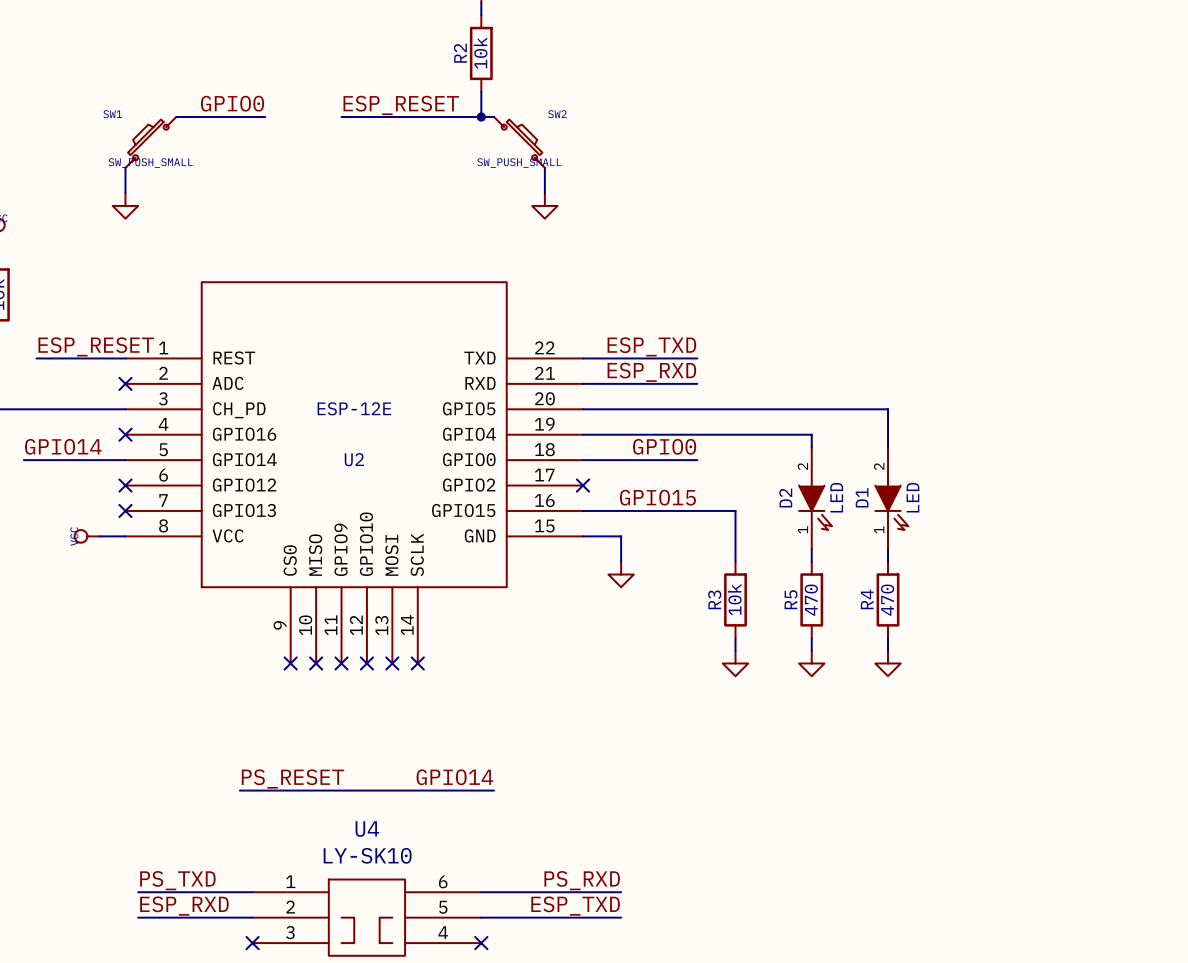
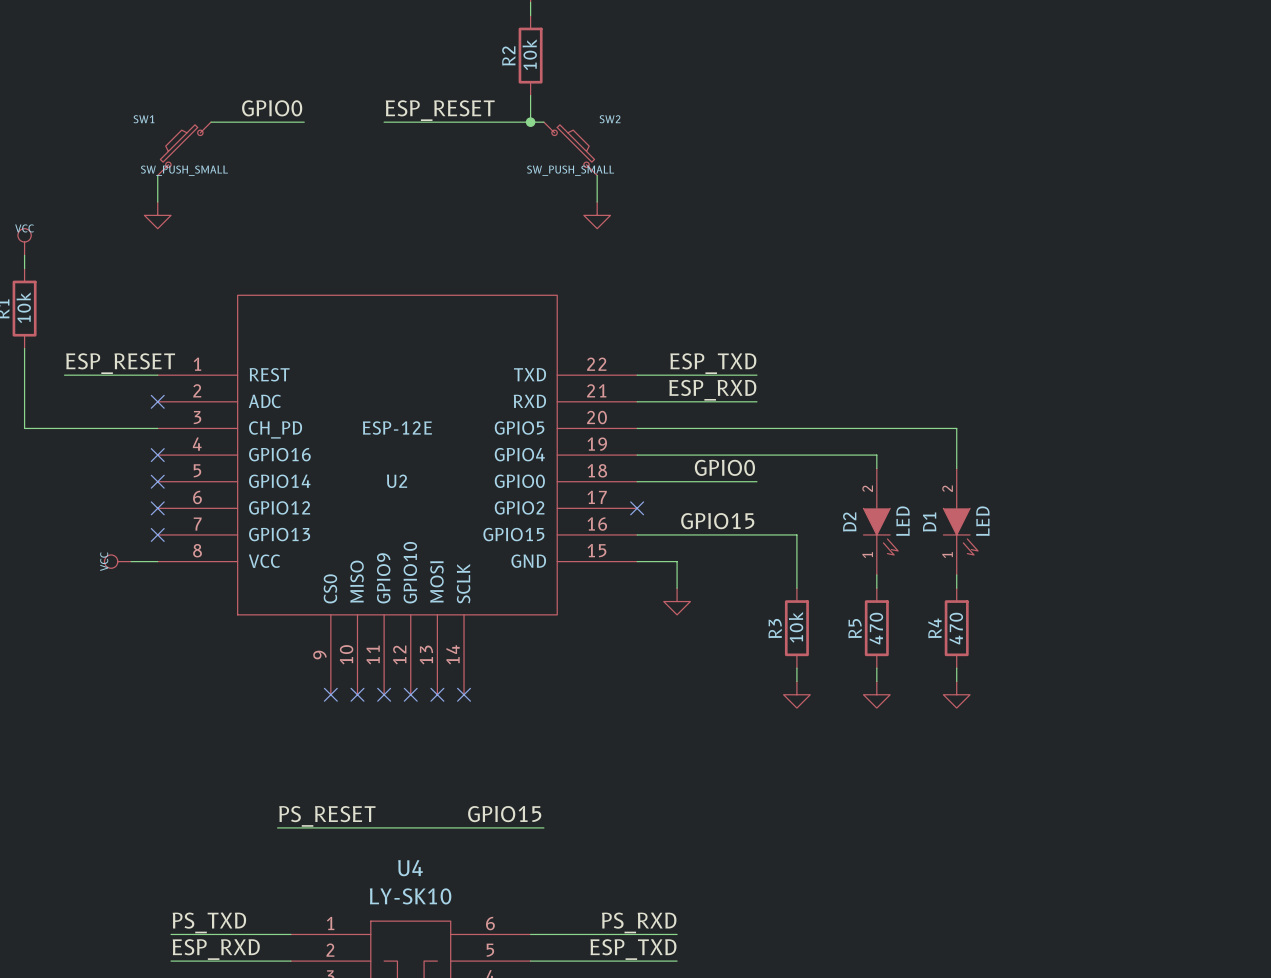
label: GPIO14 (63, 446) -> none
wire: (23, 460) (125, 460) -> none
no-connect mark: none -> (157, 481)
label: GPIO14 (454, 777) -> GPIO15 (504, 814)

